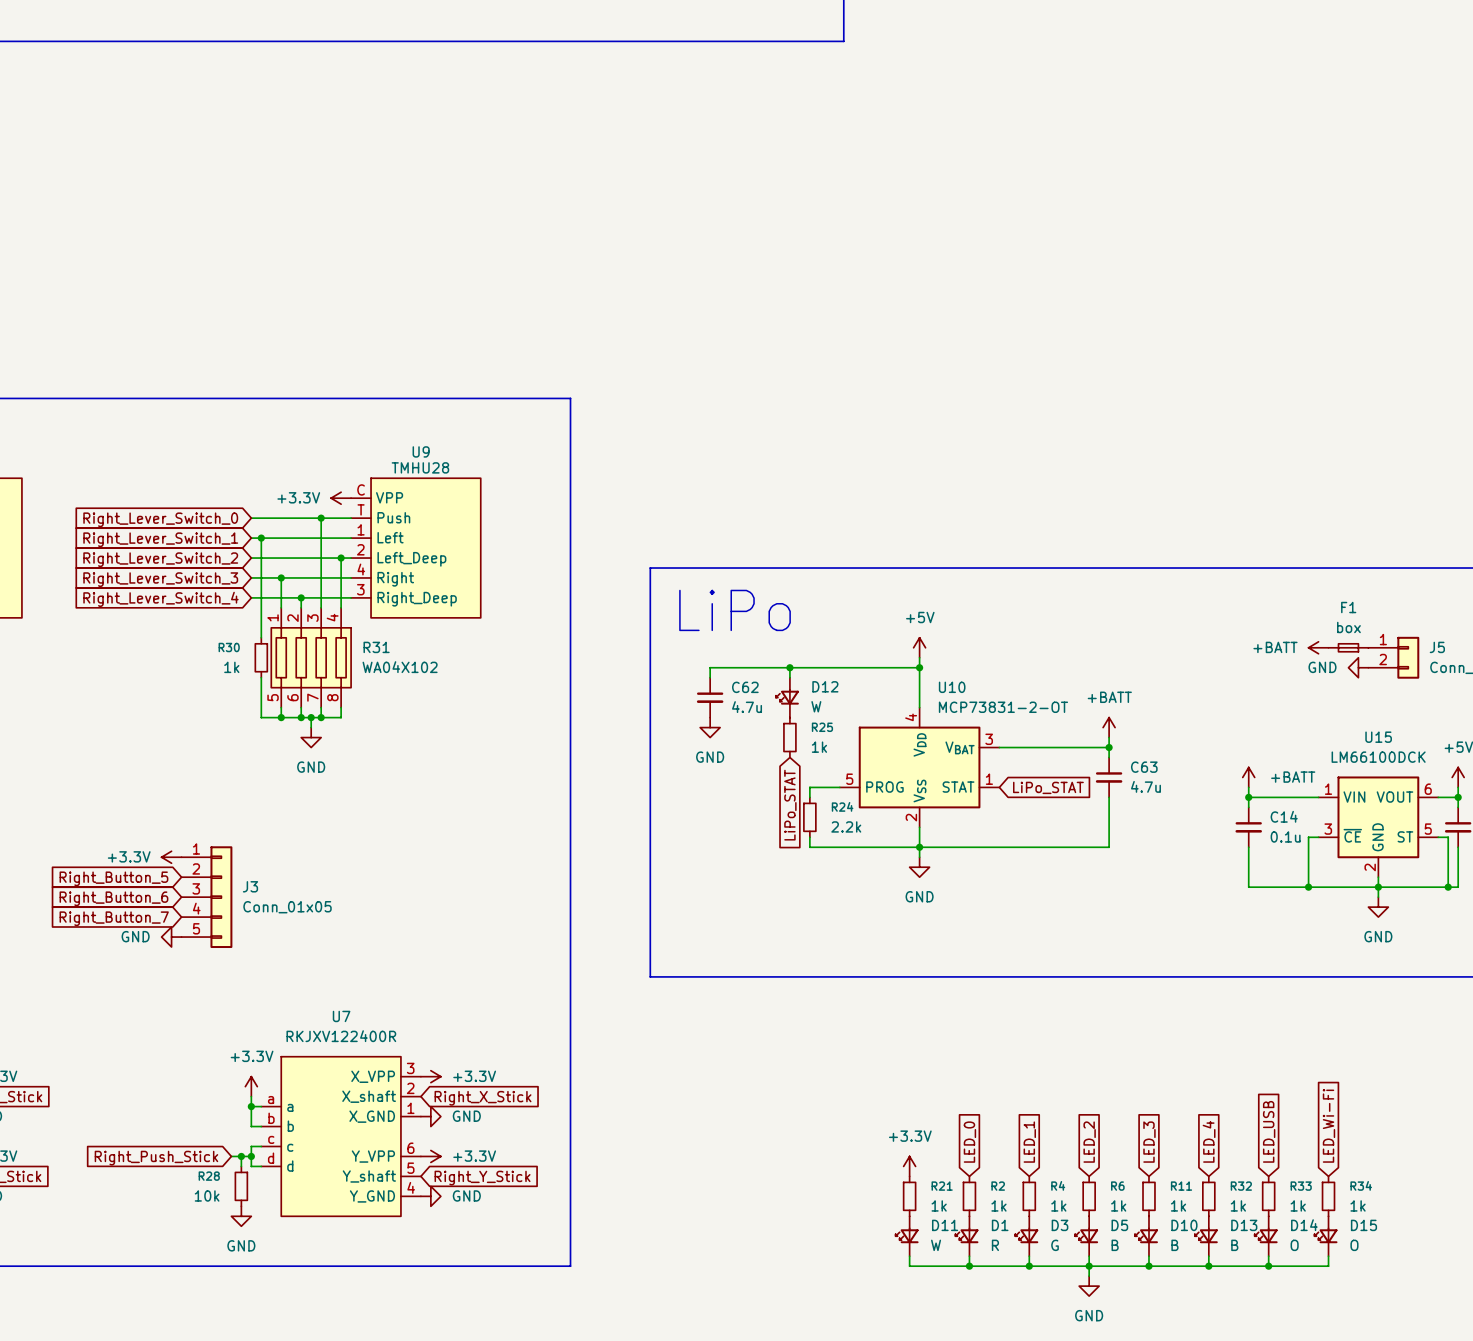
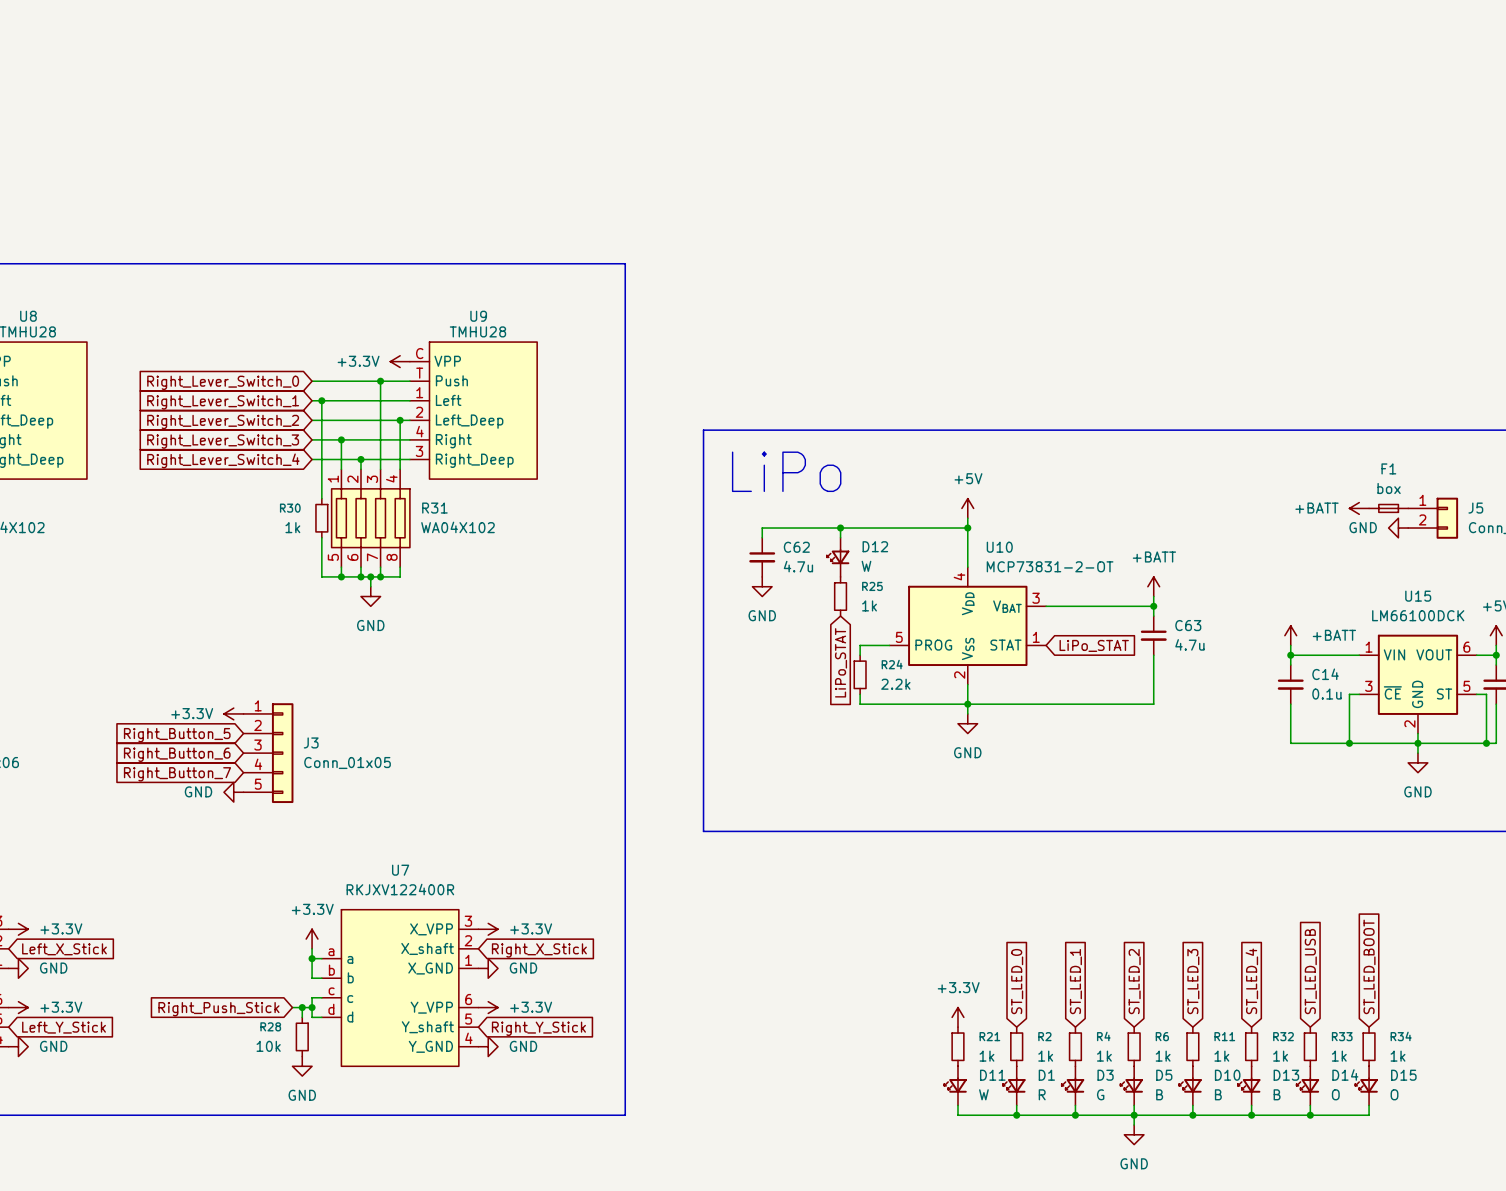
global label: LED_Wi-Fi (1328, 1125) -> ST_LED_BOOT (1369, 966)
global label: LED_USB (1269, 1131) -> ST_LED_USB (1310, 971)
global label: LED_4 (1209, 1141) -> ST_LED_4 (1251, 981)
global label: LED_0 (969, 1142) -> ST_LED_0 (1017, 981)
global label: LED_1 (1029, 1142) -> ST_LED_1 (1075, 981)
global label: LED_2 (1089, 1142) -> ST_LED_2 (1134, 981)
global label: LED_3 (1149, 1142) -> ST_LED_3 (1193, 981)

